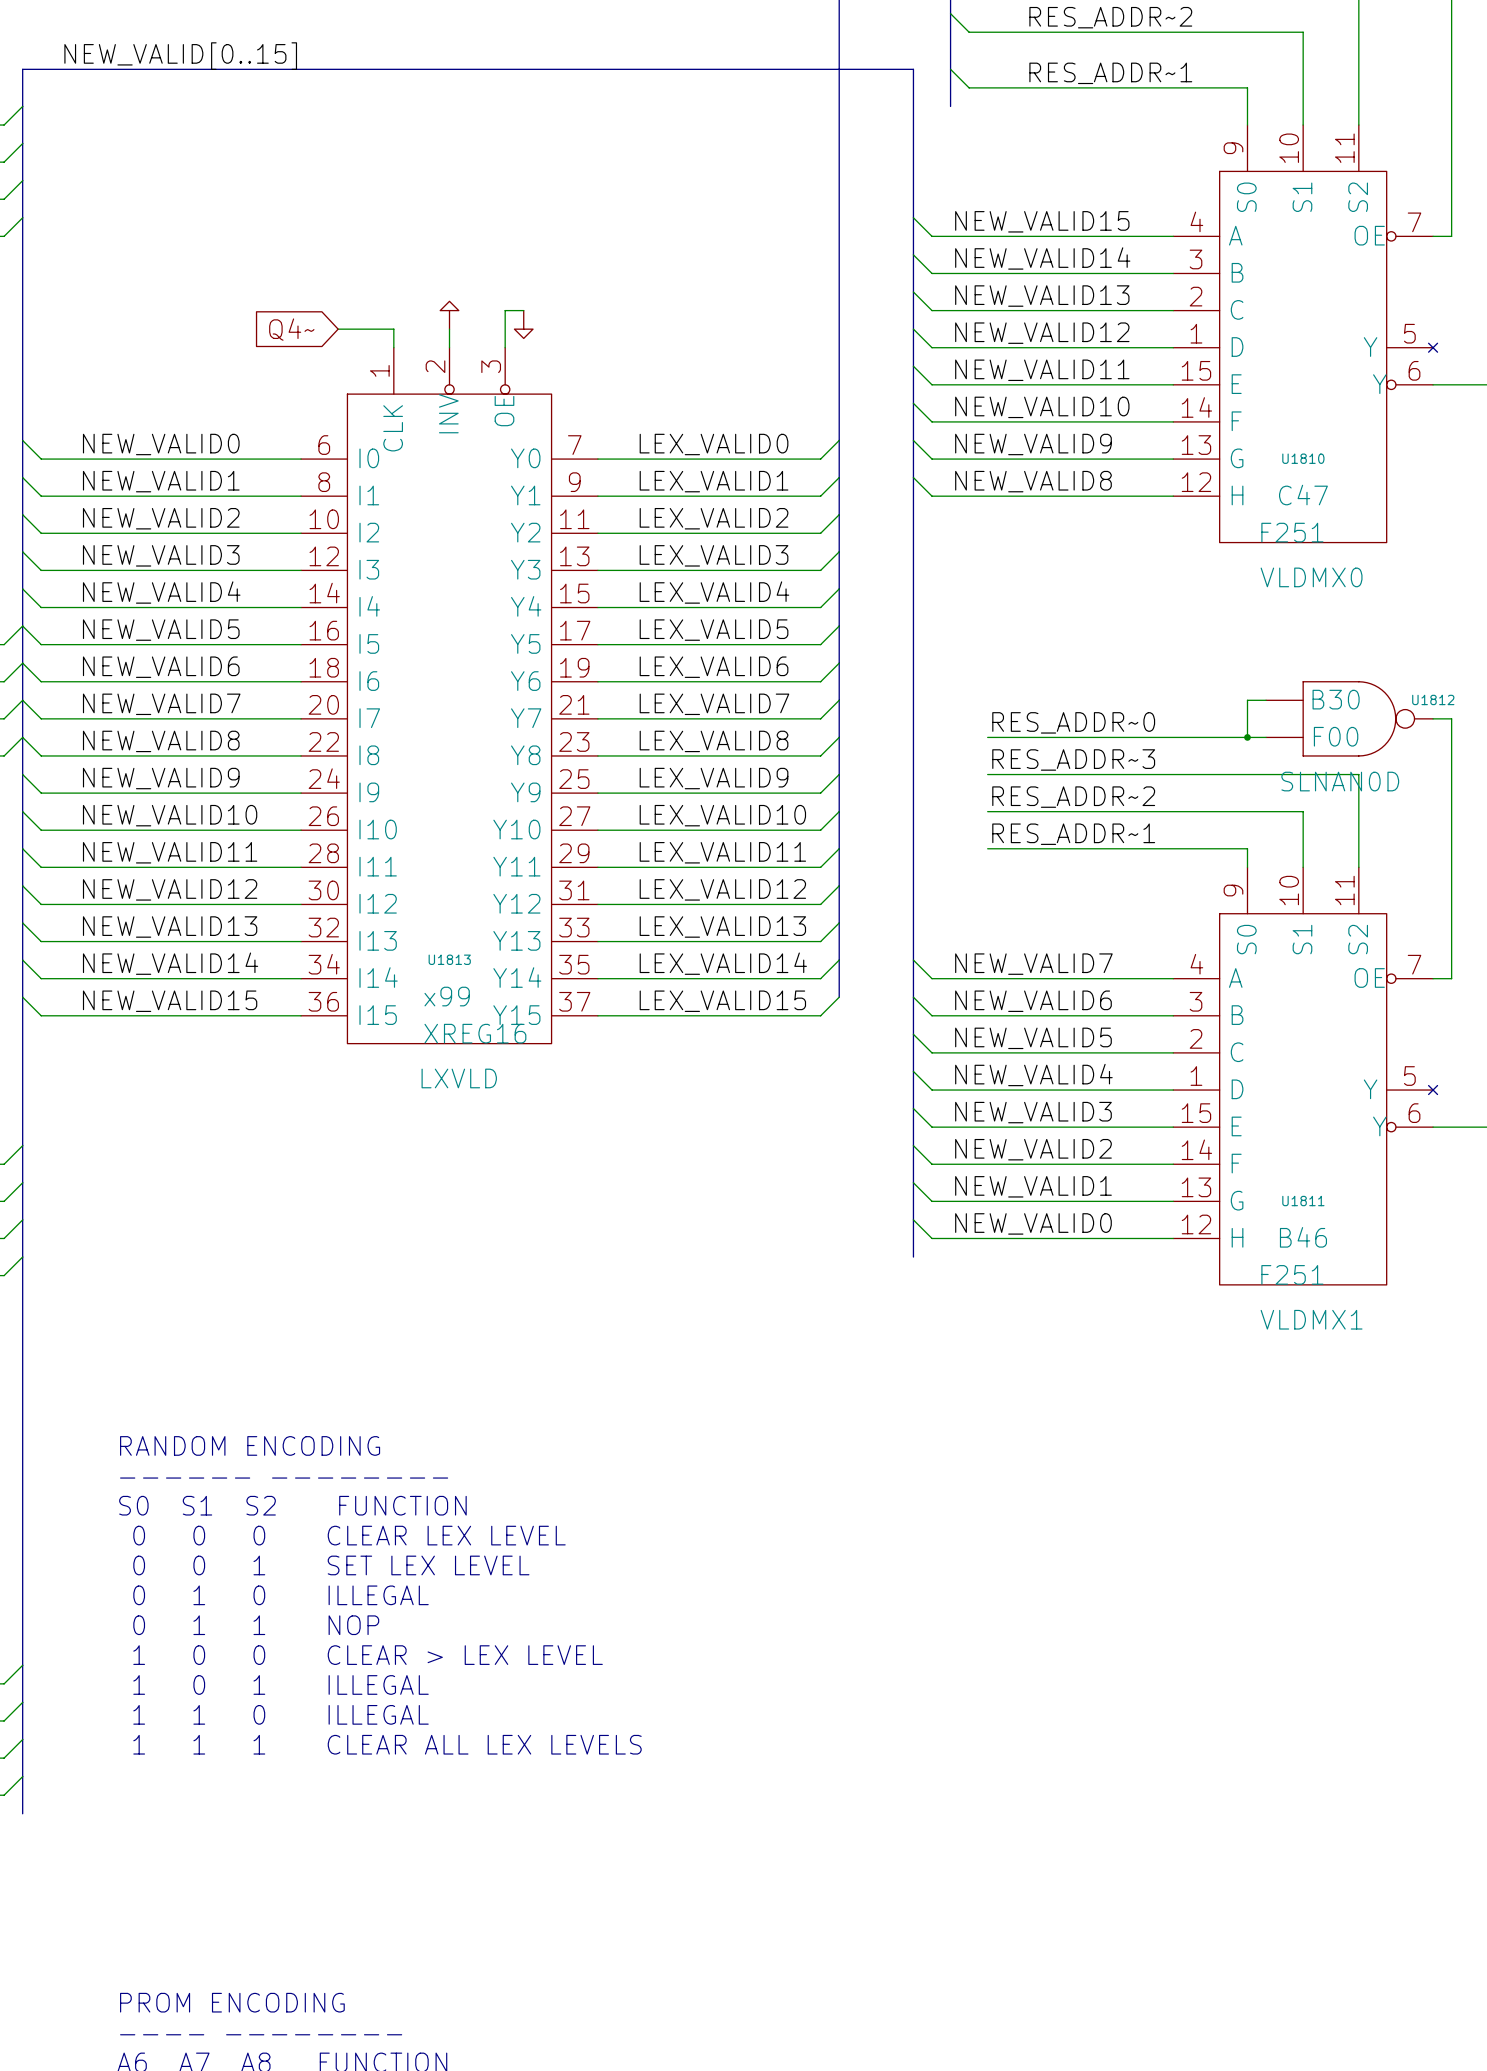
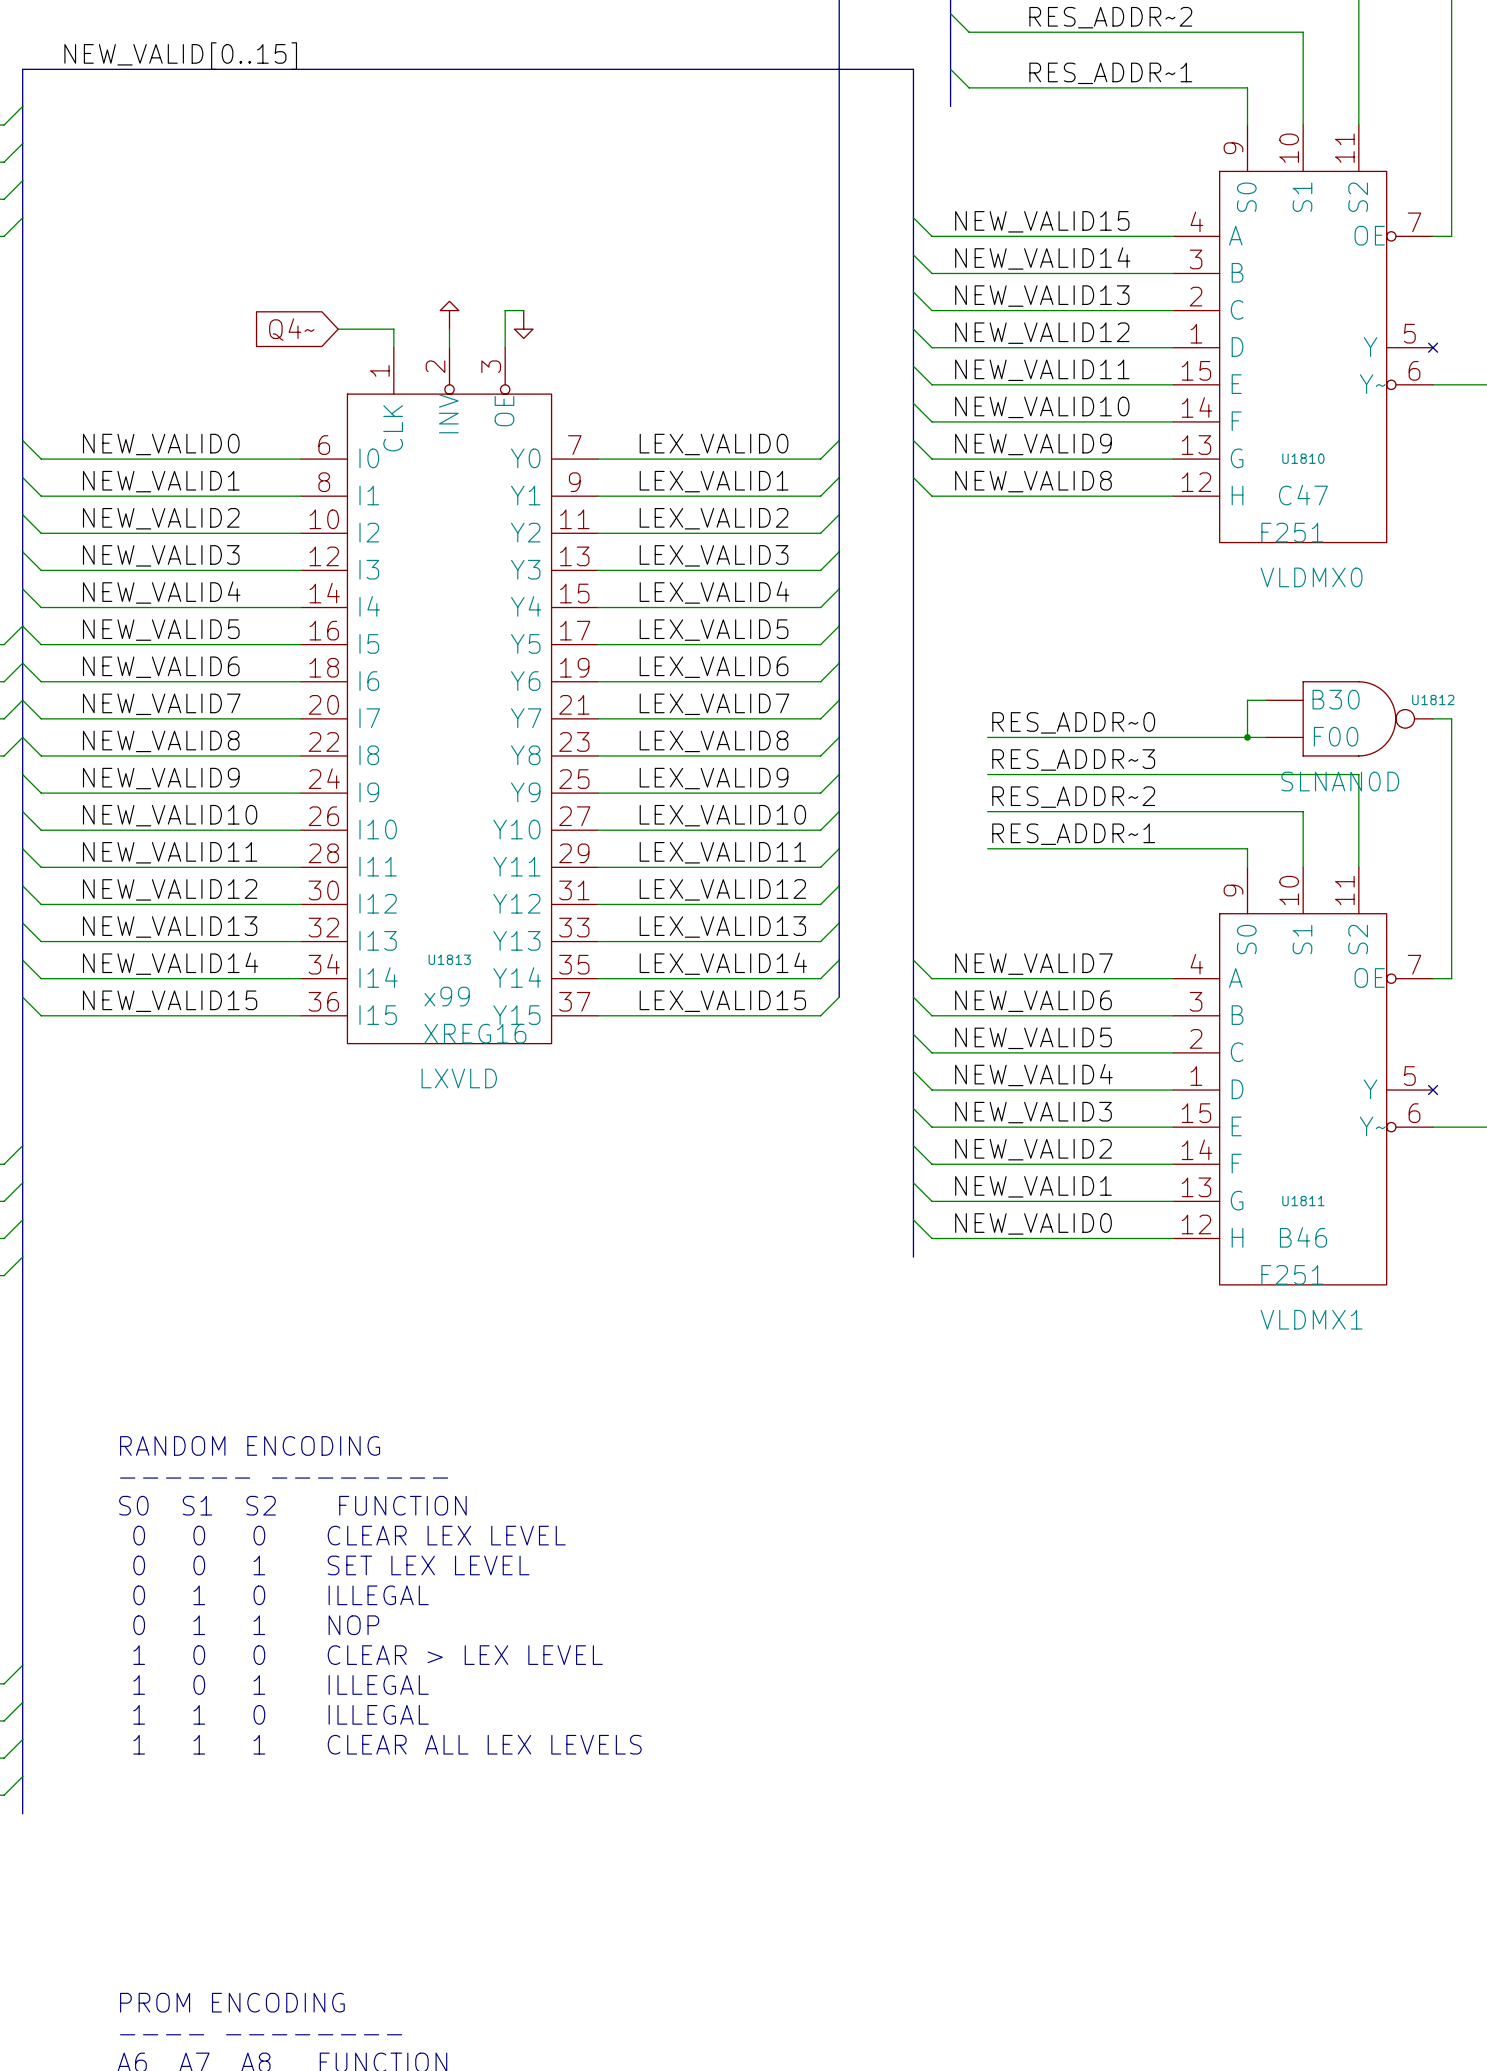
U1810 pin name: Y (1379, 384) -> Y~ (1372, 384)
U1811 pin name: Y (1379, 1126) -> Y~ (1372, 1126)

